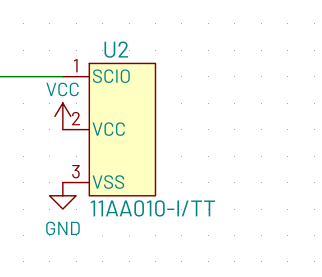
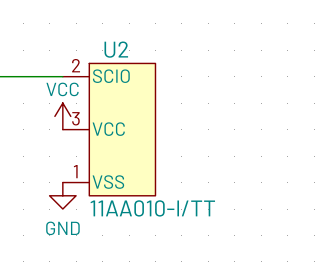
U2 pin number: 1 (75, 65) -> 2 (76, 65)
U2 pin number: 2 (76, 118) -> 3 (75, 118)
U2 pin number: 3 (75, 171) -> 1 (75, 171)

